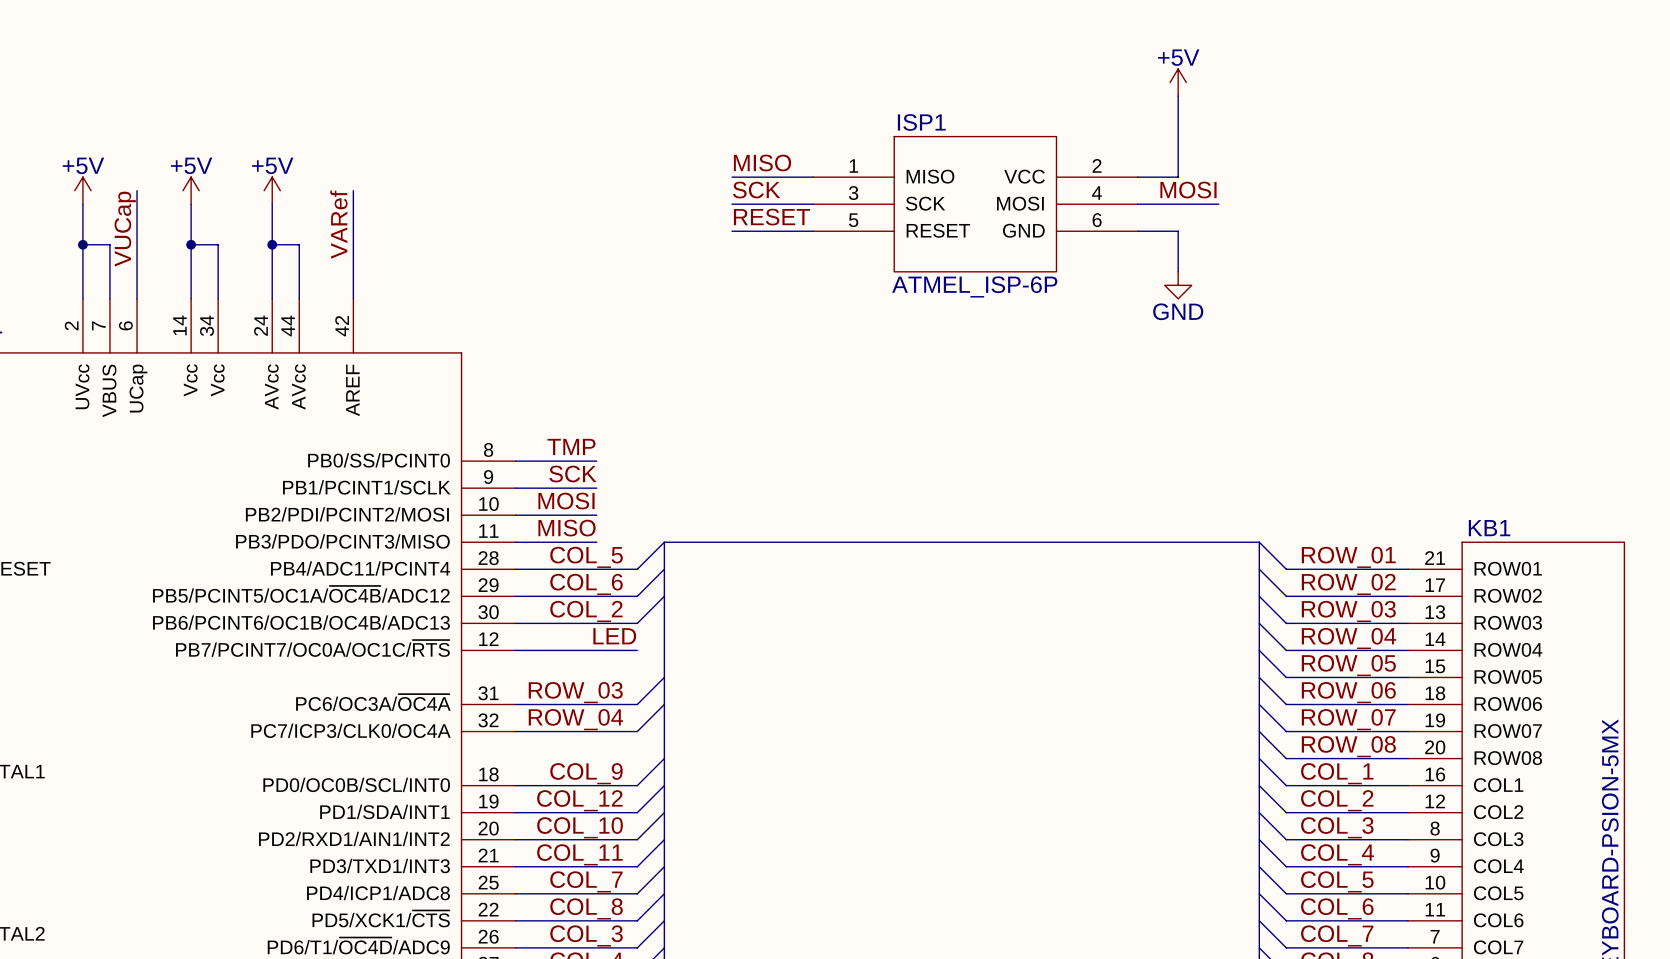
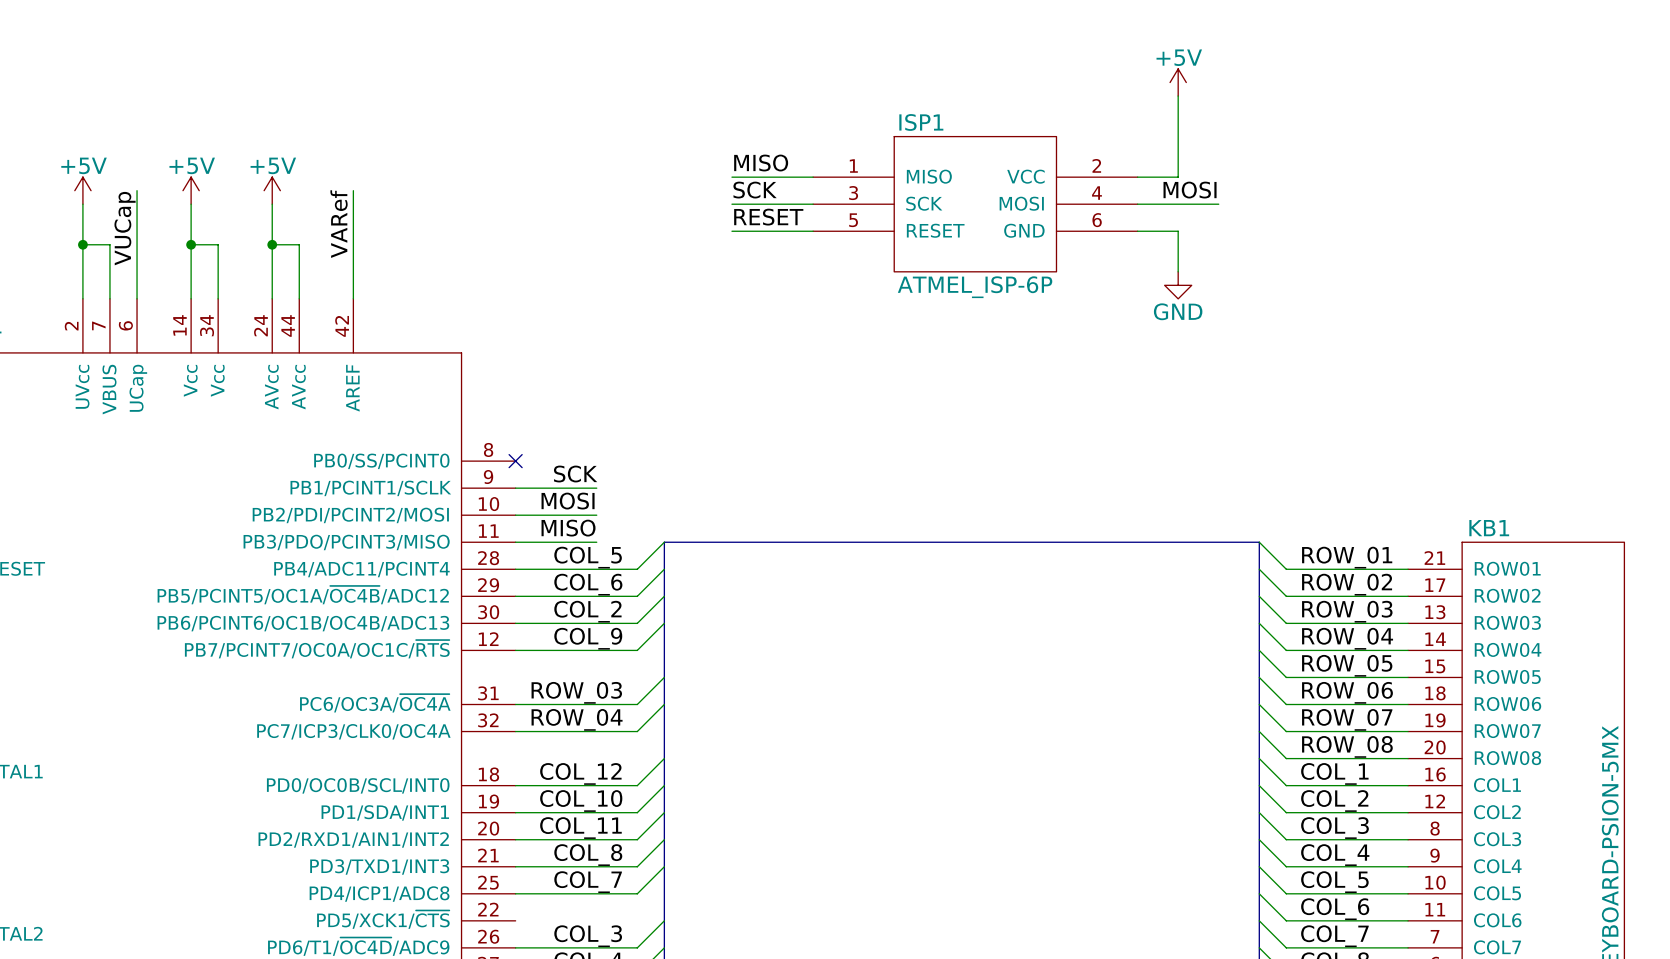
label: TMP (571, 446) -> none
wire: (515, 461) (596, 461) -> none
no-connect mark: none -> (515, 461)
wire: none -> (664, 623) (637, 650)
label: LED (614, 636) -> none
label: none -> COL_9 (588, 638)
label: COL_9 (586, 773) -> COL_12 (580, 773)
label: COL_12 (579, 800) -> COL_10 (581, 801)
label: COL_10 (580, 827) -> COL_11 (580, 828)
label: COL_11 (579, 854) -> COL_8 (588, 855)
wire: (664, 893) (637, 920) (515, 920) -> none
label: COL_8 (586, 908) -> none

